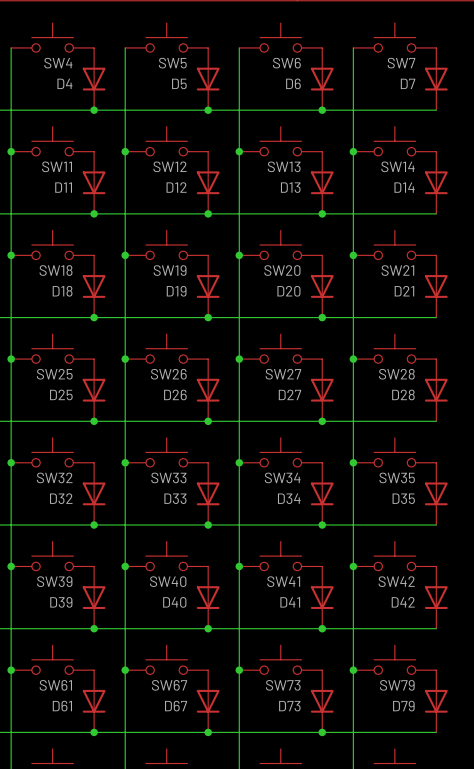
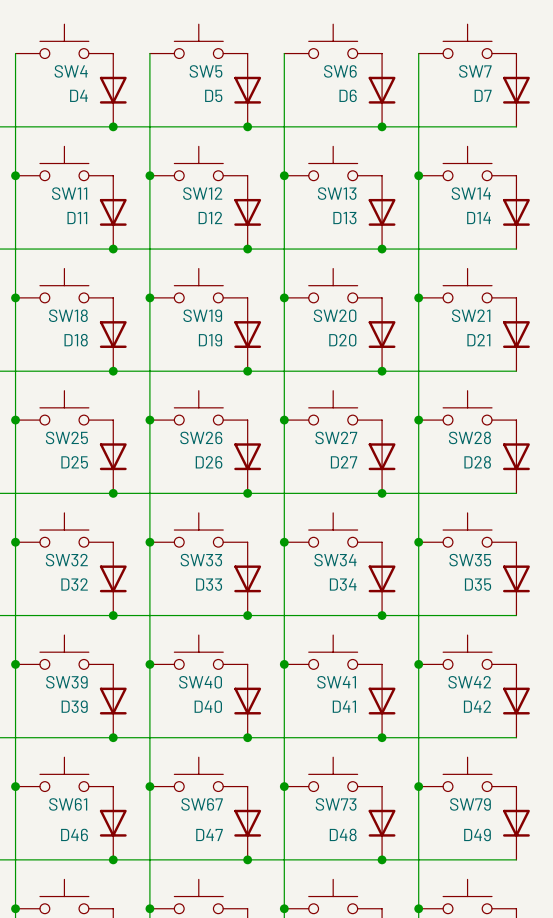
D61 name: D61 (62, 706) -> D46 (74, 834)
D67 name: D67 (176, 706) -> D47 (209, 834)
D73 name: D73 (289, 706) -> D48 (343, 834)
D79 name: D79 (403, 706) -> D49 (477, 834)

